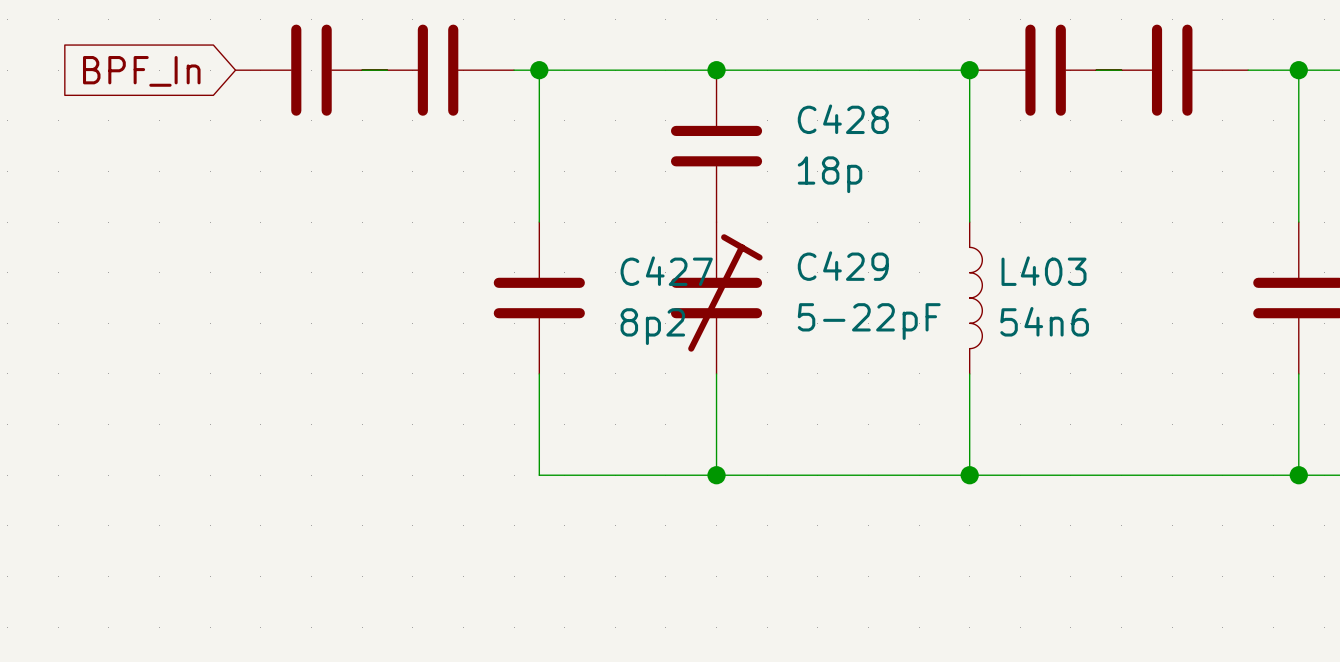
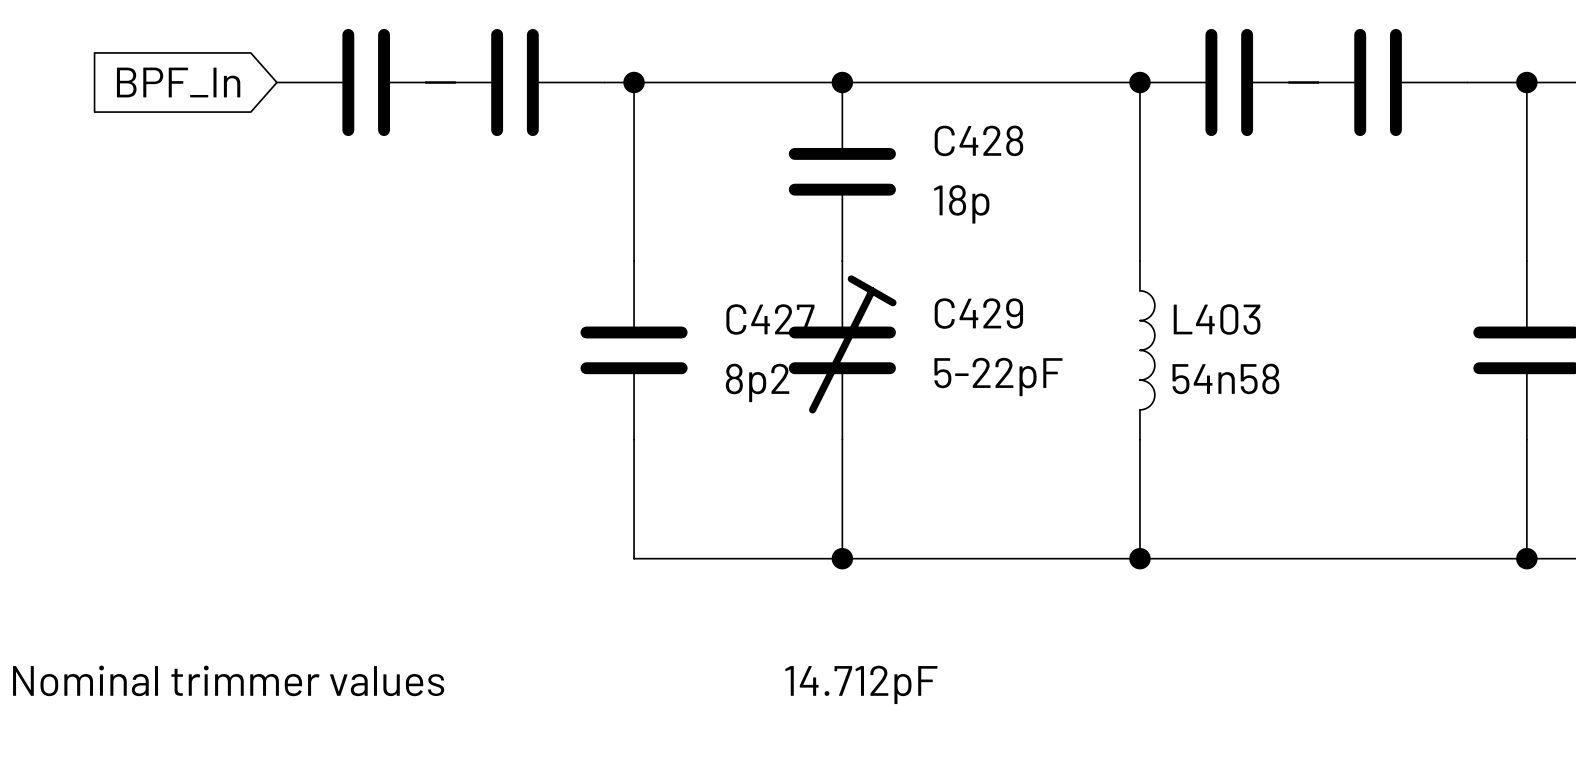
L403 value: 54n6 (1044, 321) -> 54n58 (1225, 378)
label: none -> Nominal trimmer values (228, 680)
label: none -> 14.712pF (861, 684)

